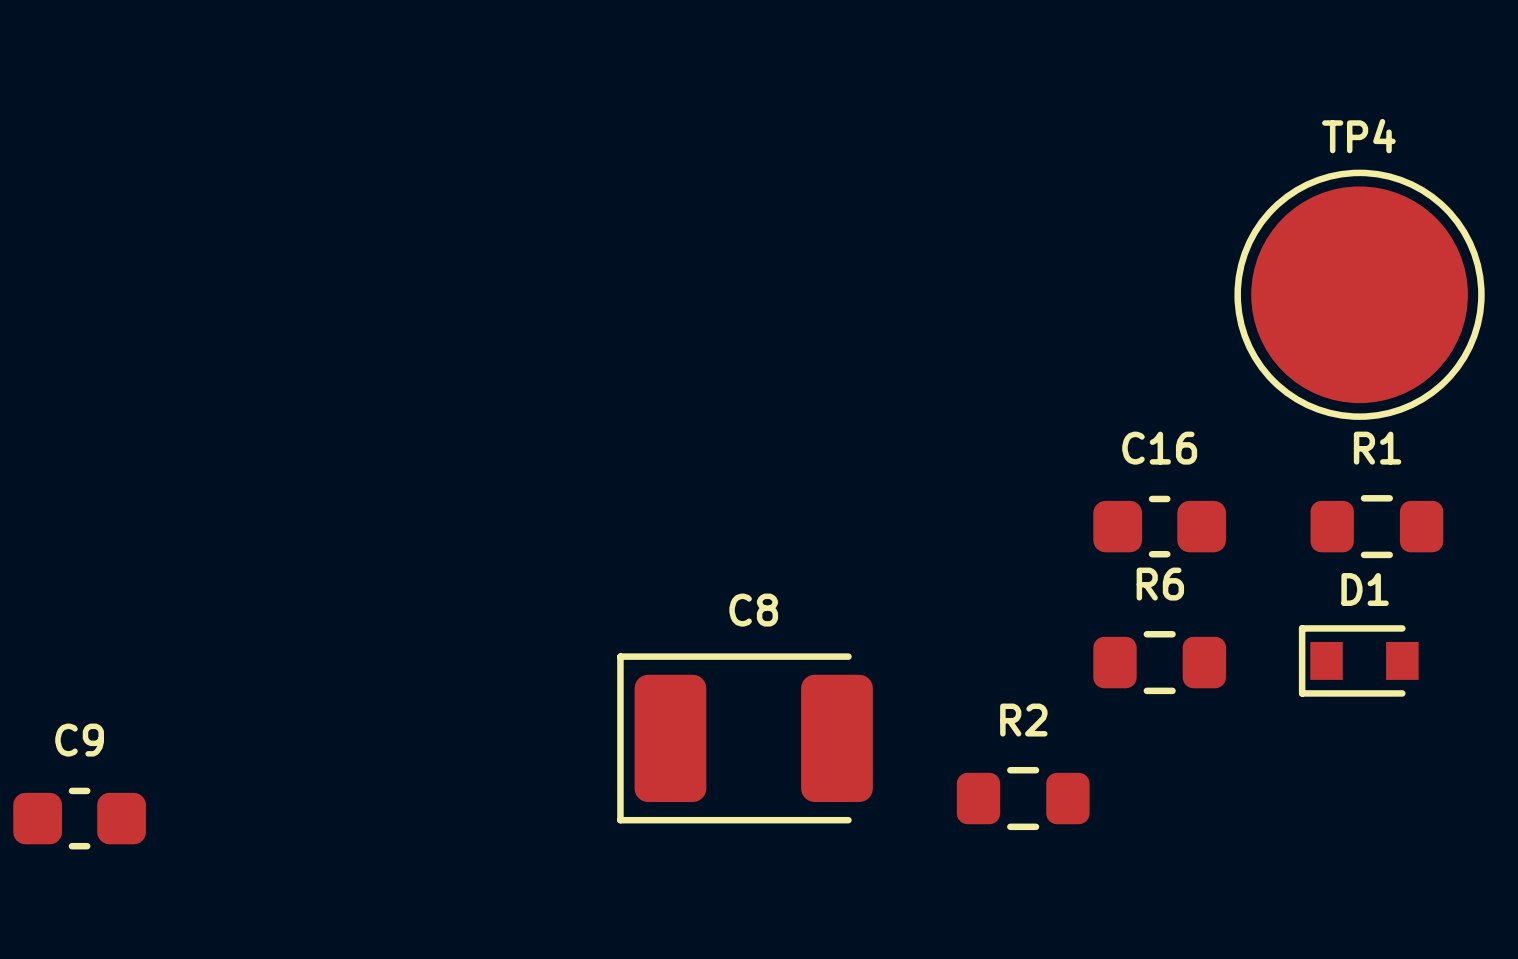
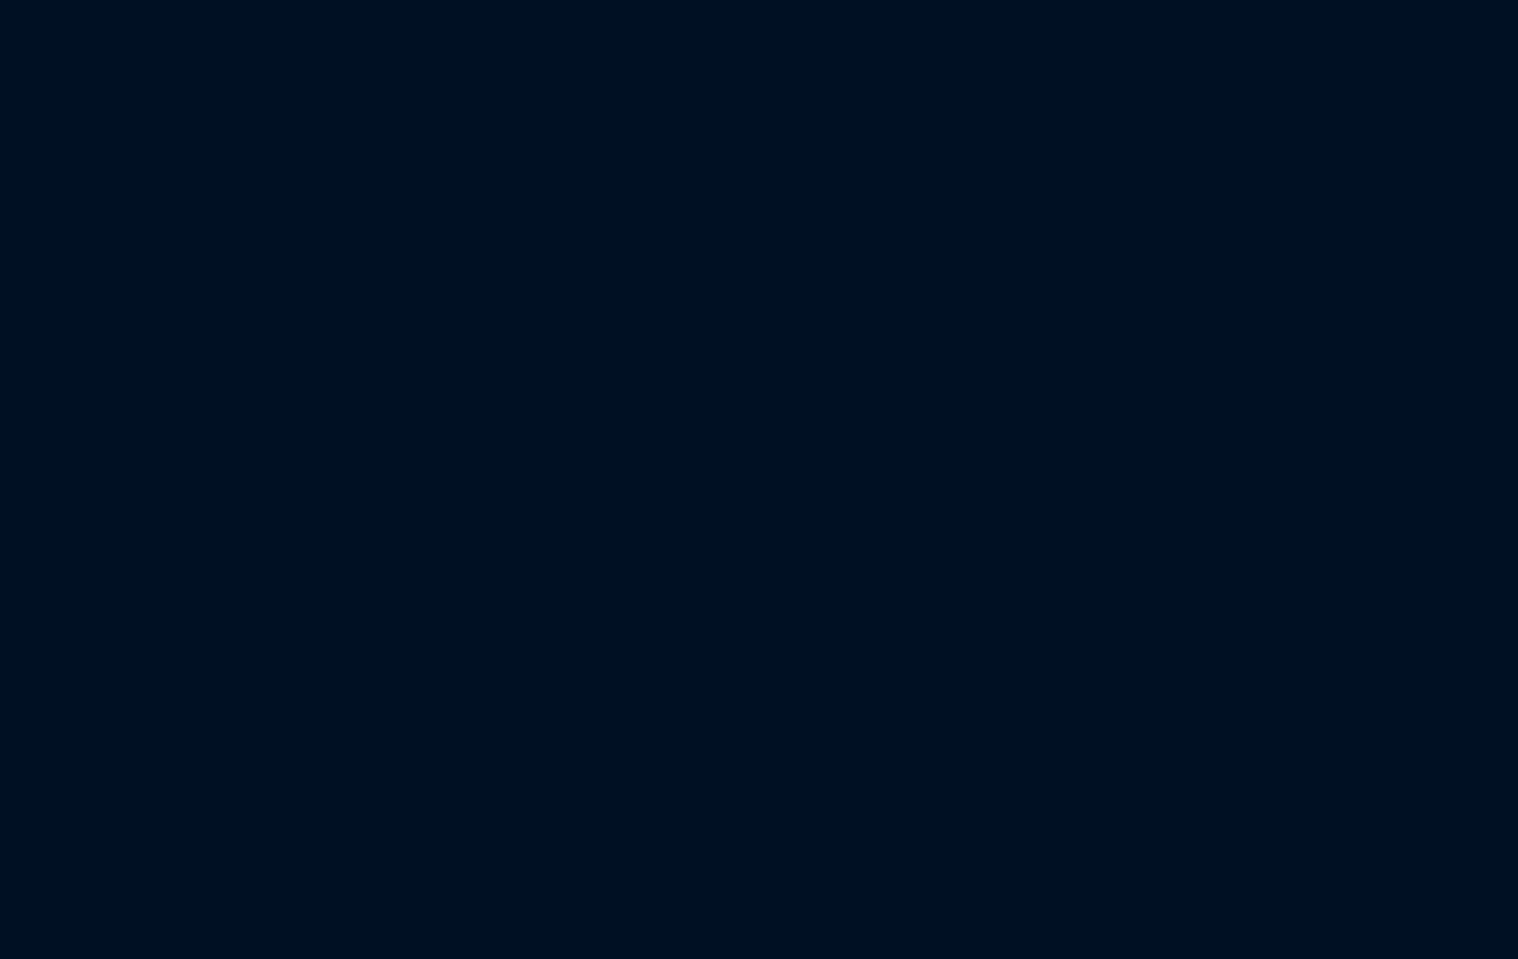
TP4: (1359, 294) -> none
C16: (1159, 526) -> none
R1: (1376, 526) -> none
D1: (1358, 660) -> none
R6: (1159, 662) -> none
C8: (745, 738) -> none
R2: (1023, 798) -> none
C9: (79, 818) -> none

